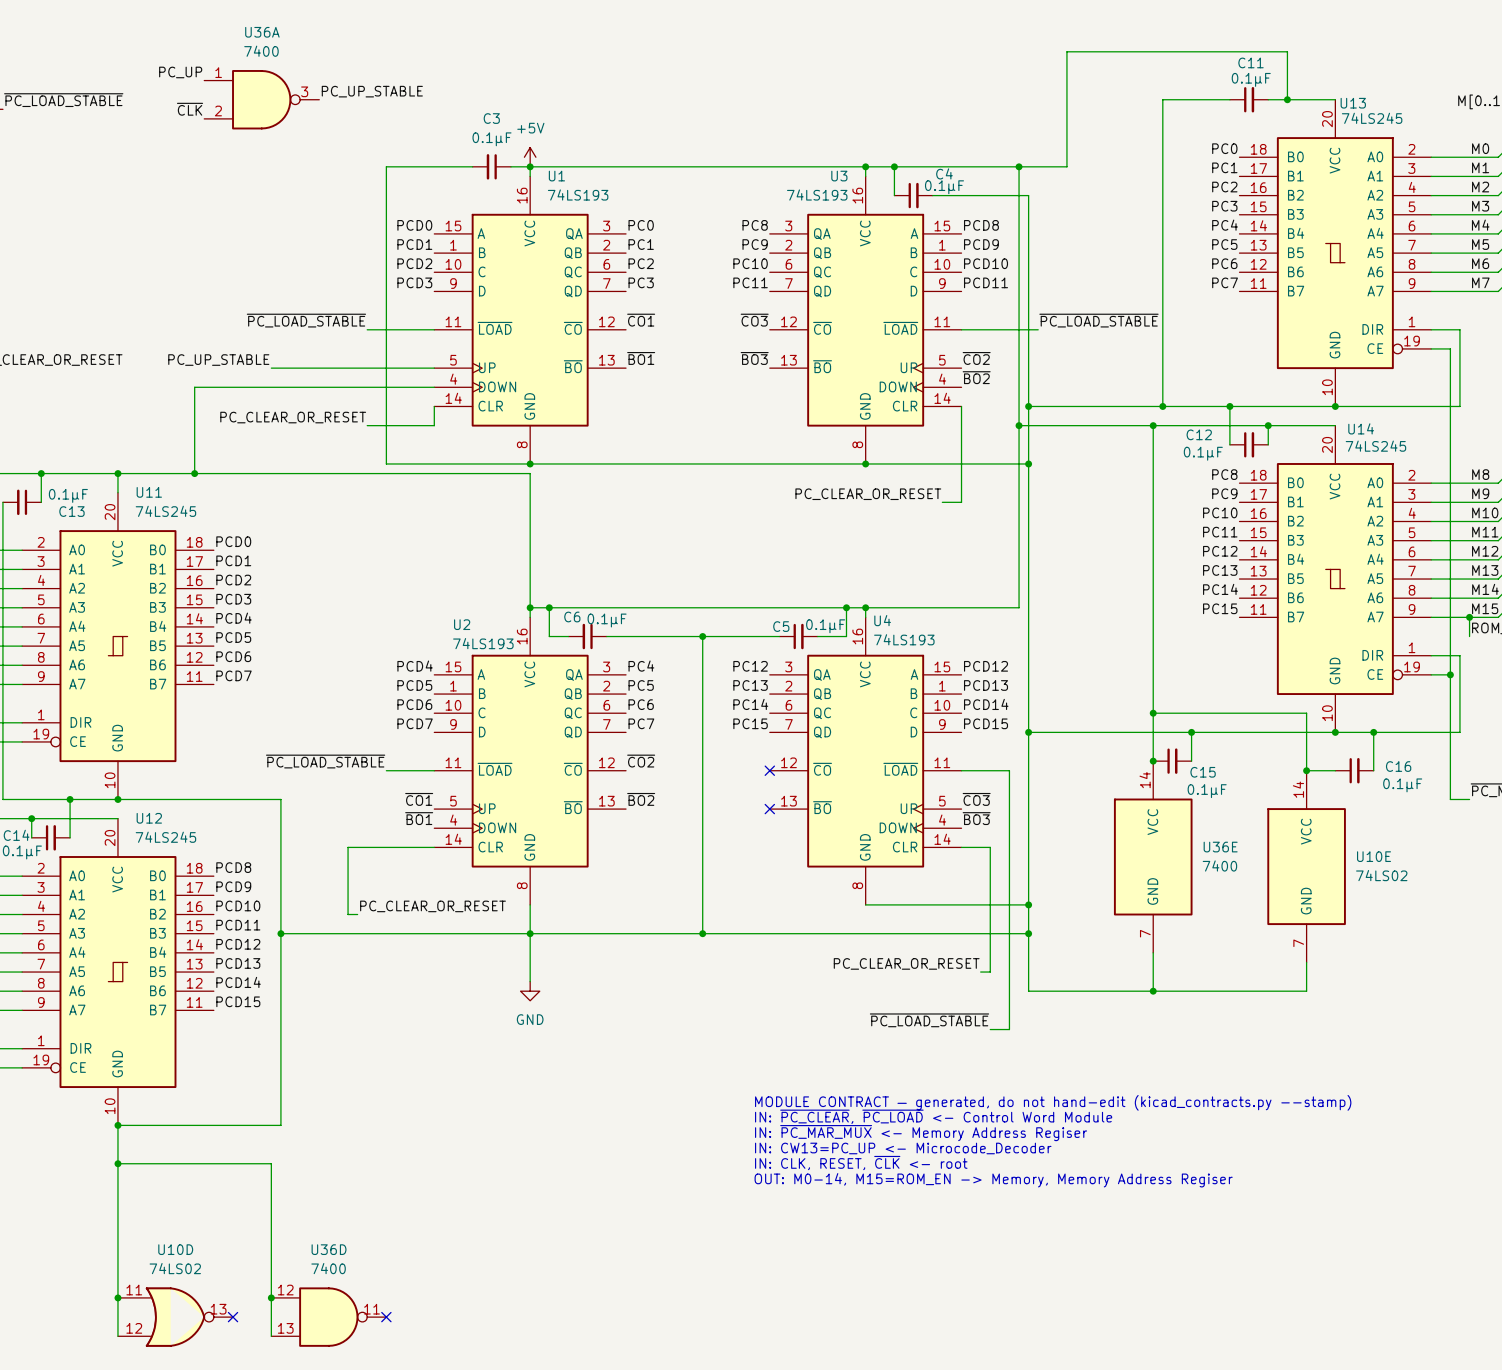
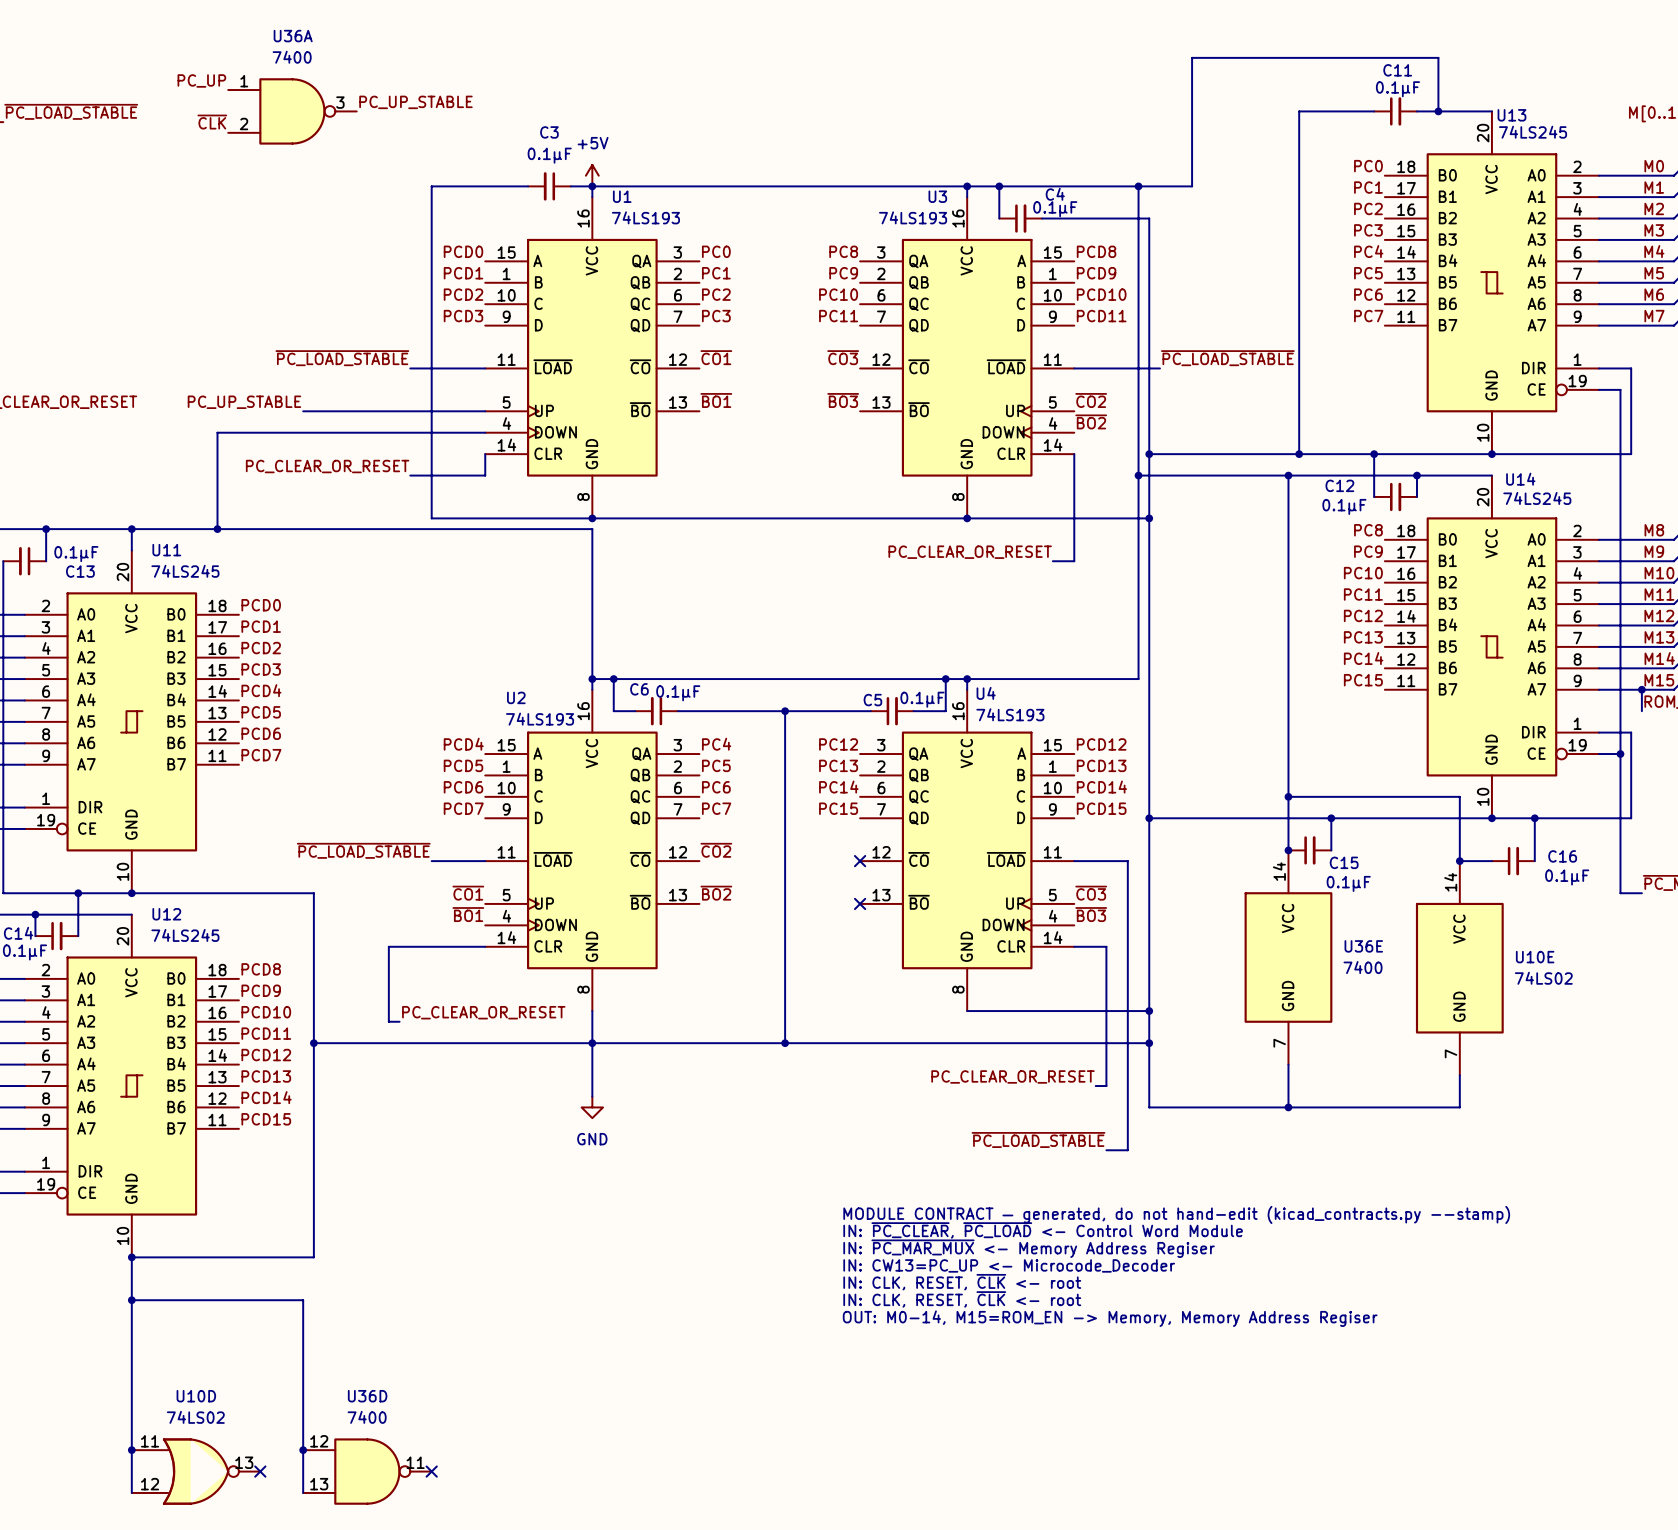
text: none -> MODULE CONTRACT — generated, do not hand-edit (kicad_contracts.py --stamp) (1176, 1214)
text: MODULE CONTRACT — generated, do not hand-edit (kicad_contracts.py --stamp) (1053, 1102) -> IN: ~{PC_CLEAR}, ~{PC_LOAD} <- Control Word Module (1043, 1230)
text: IN: ~{PC_CLEAR}, ~{PC_LOAD} <- Control Word Module (933, 1116) -> IN: ~{PC_MAR_MUX} <- Memory Address Regiser (1029, 1248)
text: IN: ~{PC_MAR_MUX} <- Memory Address Regiser (921, 1133) -> IN: CW13=PC_UP <- Microcode_Decoder (1009, 1265)
text: IN: CW13=PC_UP <- Microcode_Decoder (903, 1148) -> IN: CLK, RESET, ~{CLK} <- root (962, 1282)

